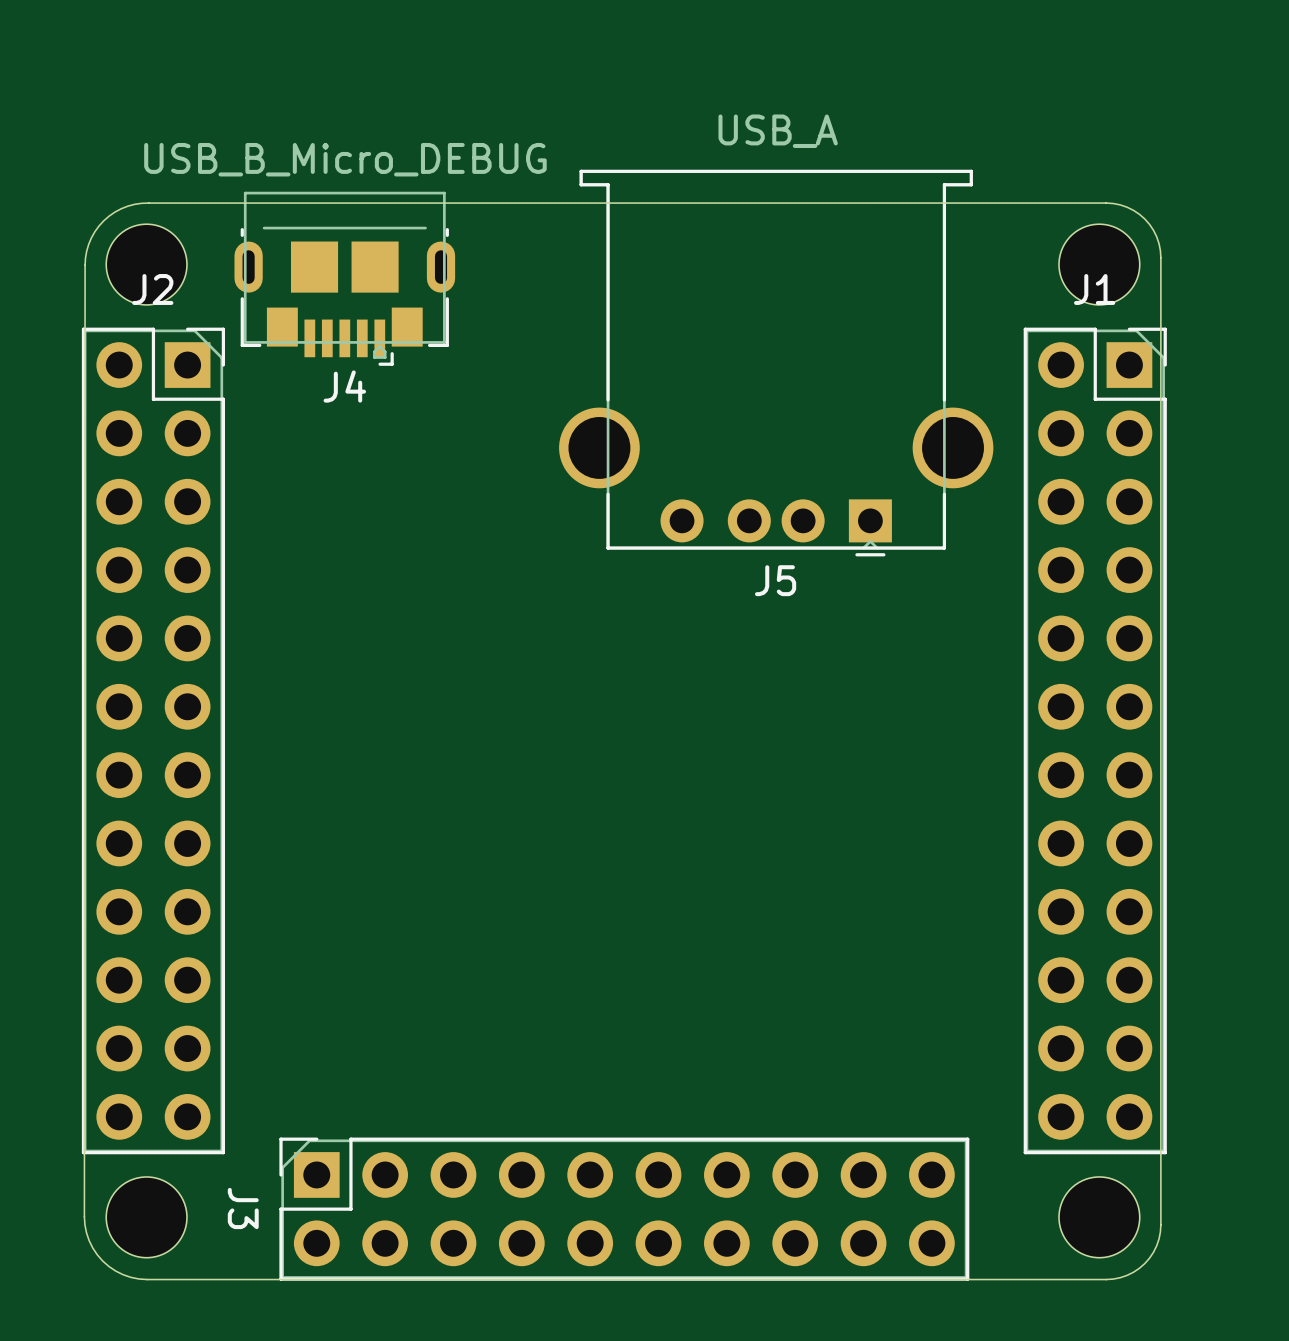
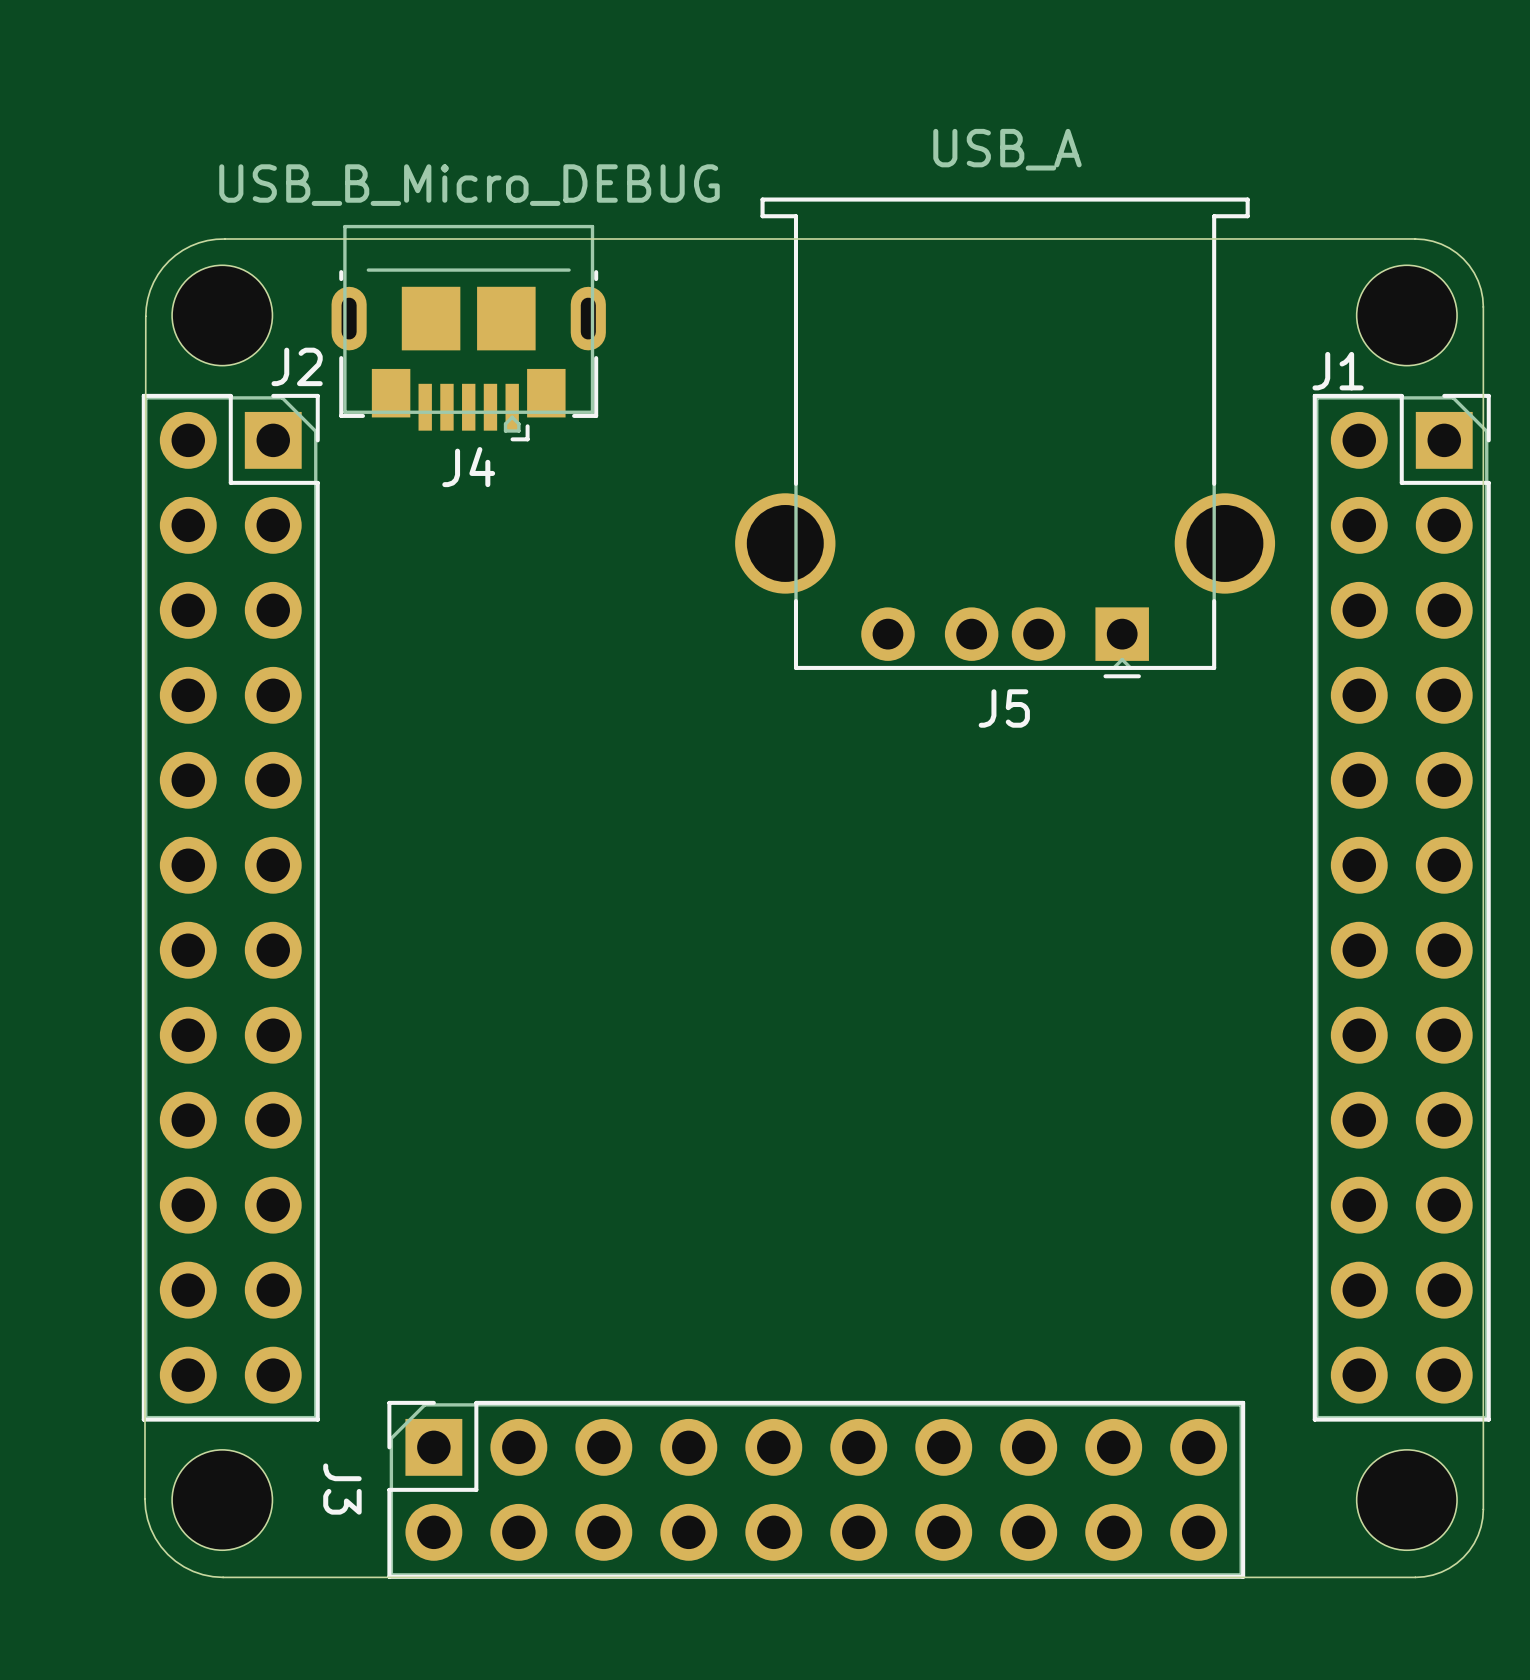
J2 name position: J2 (152, 289) -> J2 (297, 366)
J1 name position: J1 (1094, 289) -> J1 (1338, 371)

